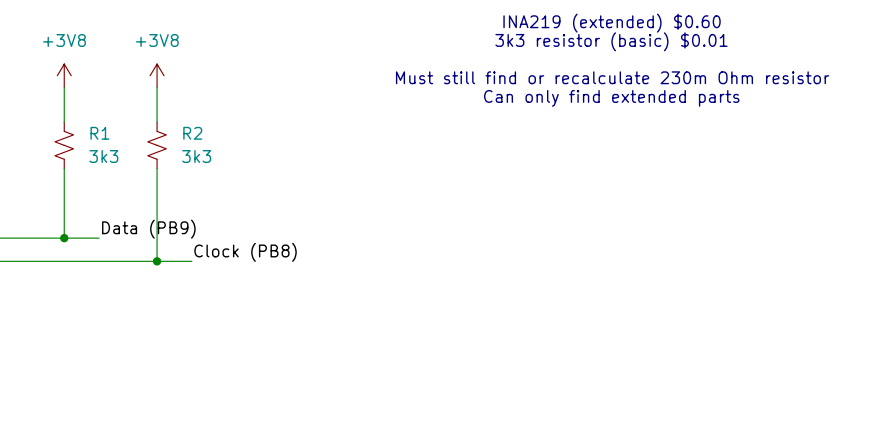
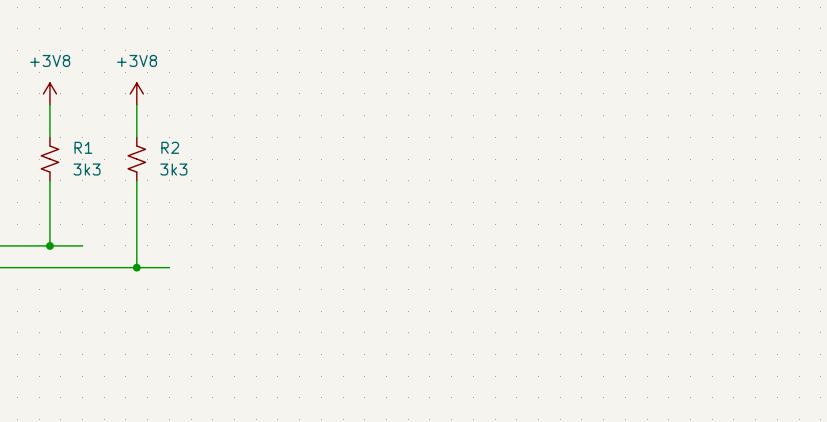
text: INA219 (extended) $0.60 (612, 23) -> none
text: 3k3 resistor (basic) $0.01 (611, 41) -> none
text: Must still find or recalculate 230m Ohm resistor (612, 77) -> none
text: Can only find extended parts (611, 98) -> none
label: Data (PB9) (148, 229) -> none
label: Clock (PB8) (245, 252) -> none

